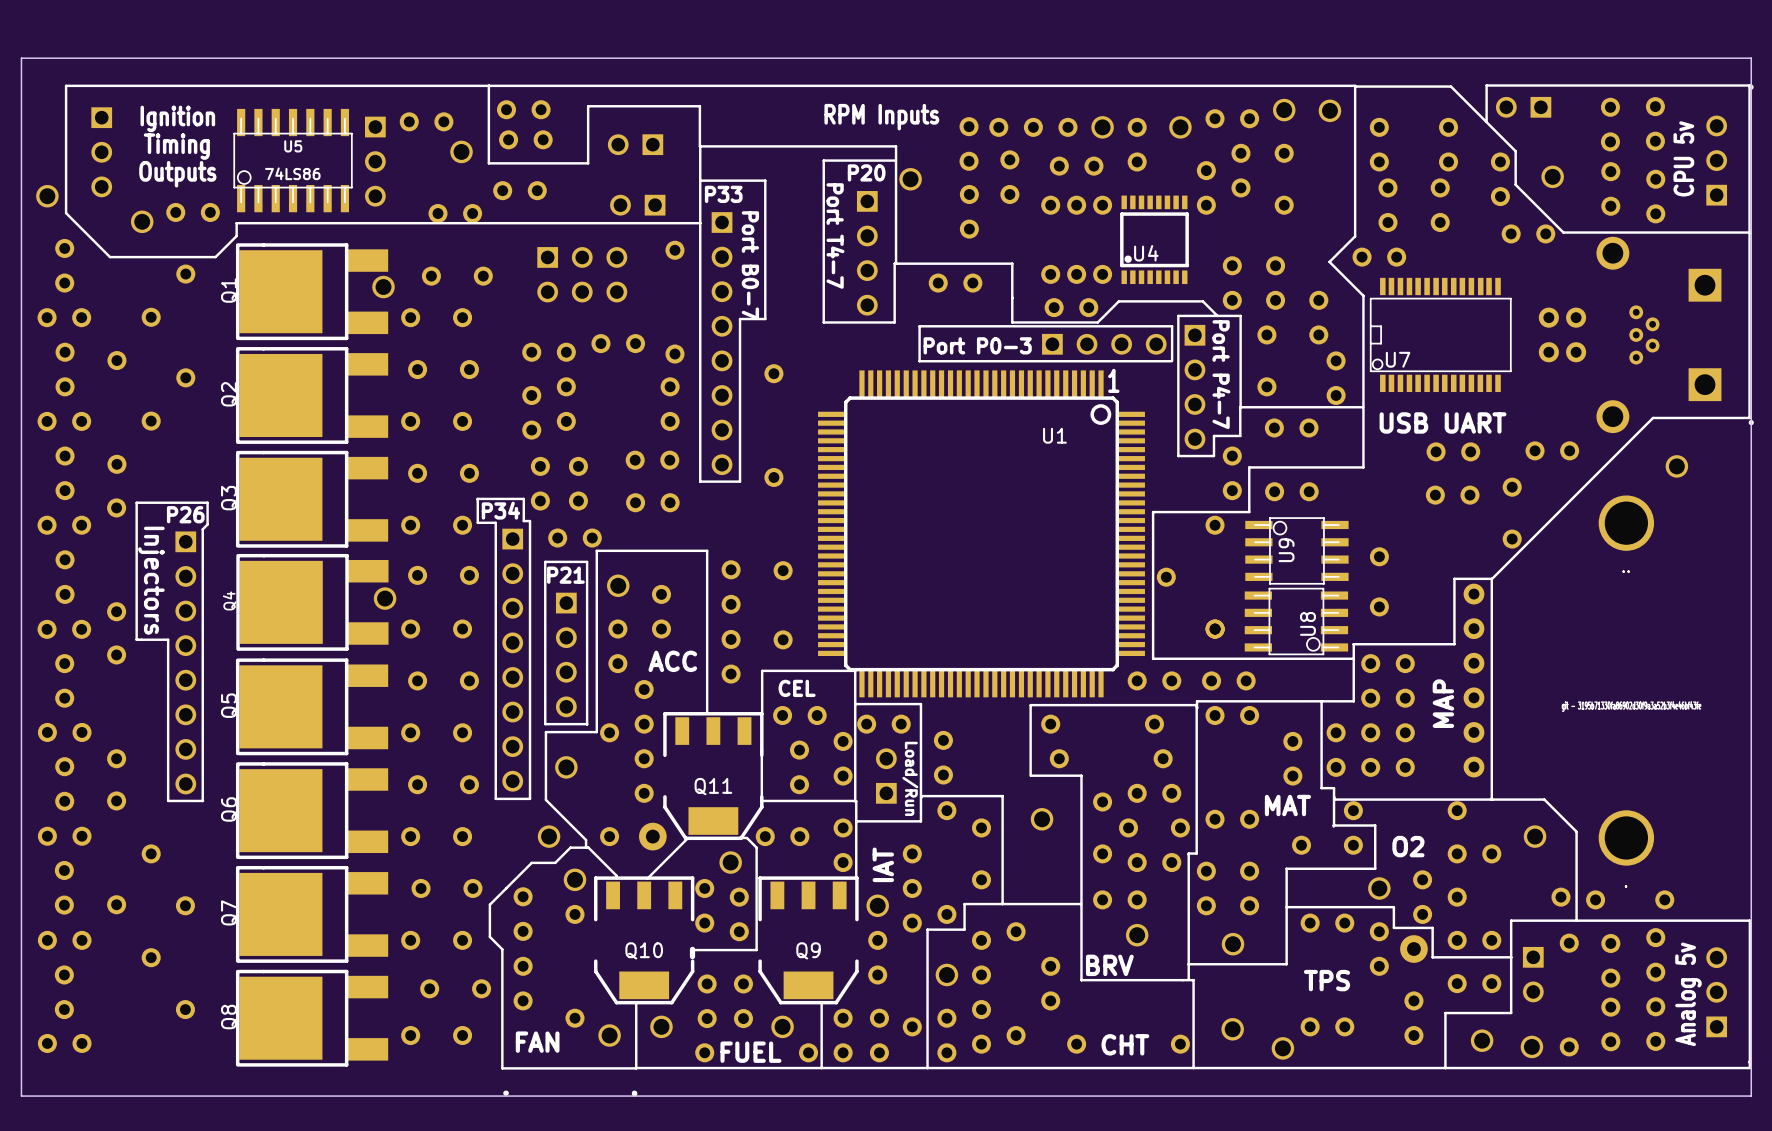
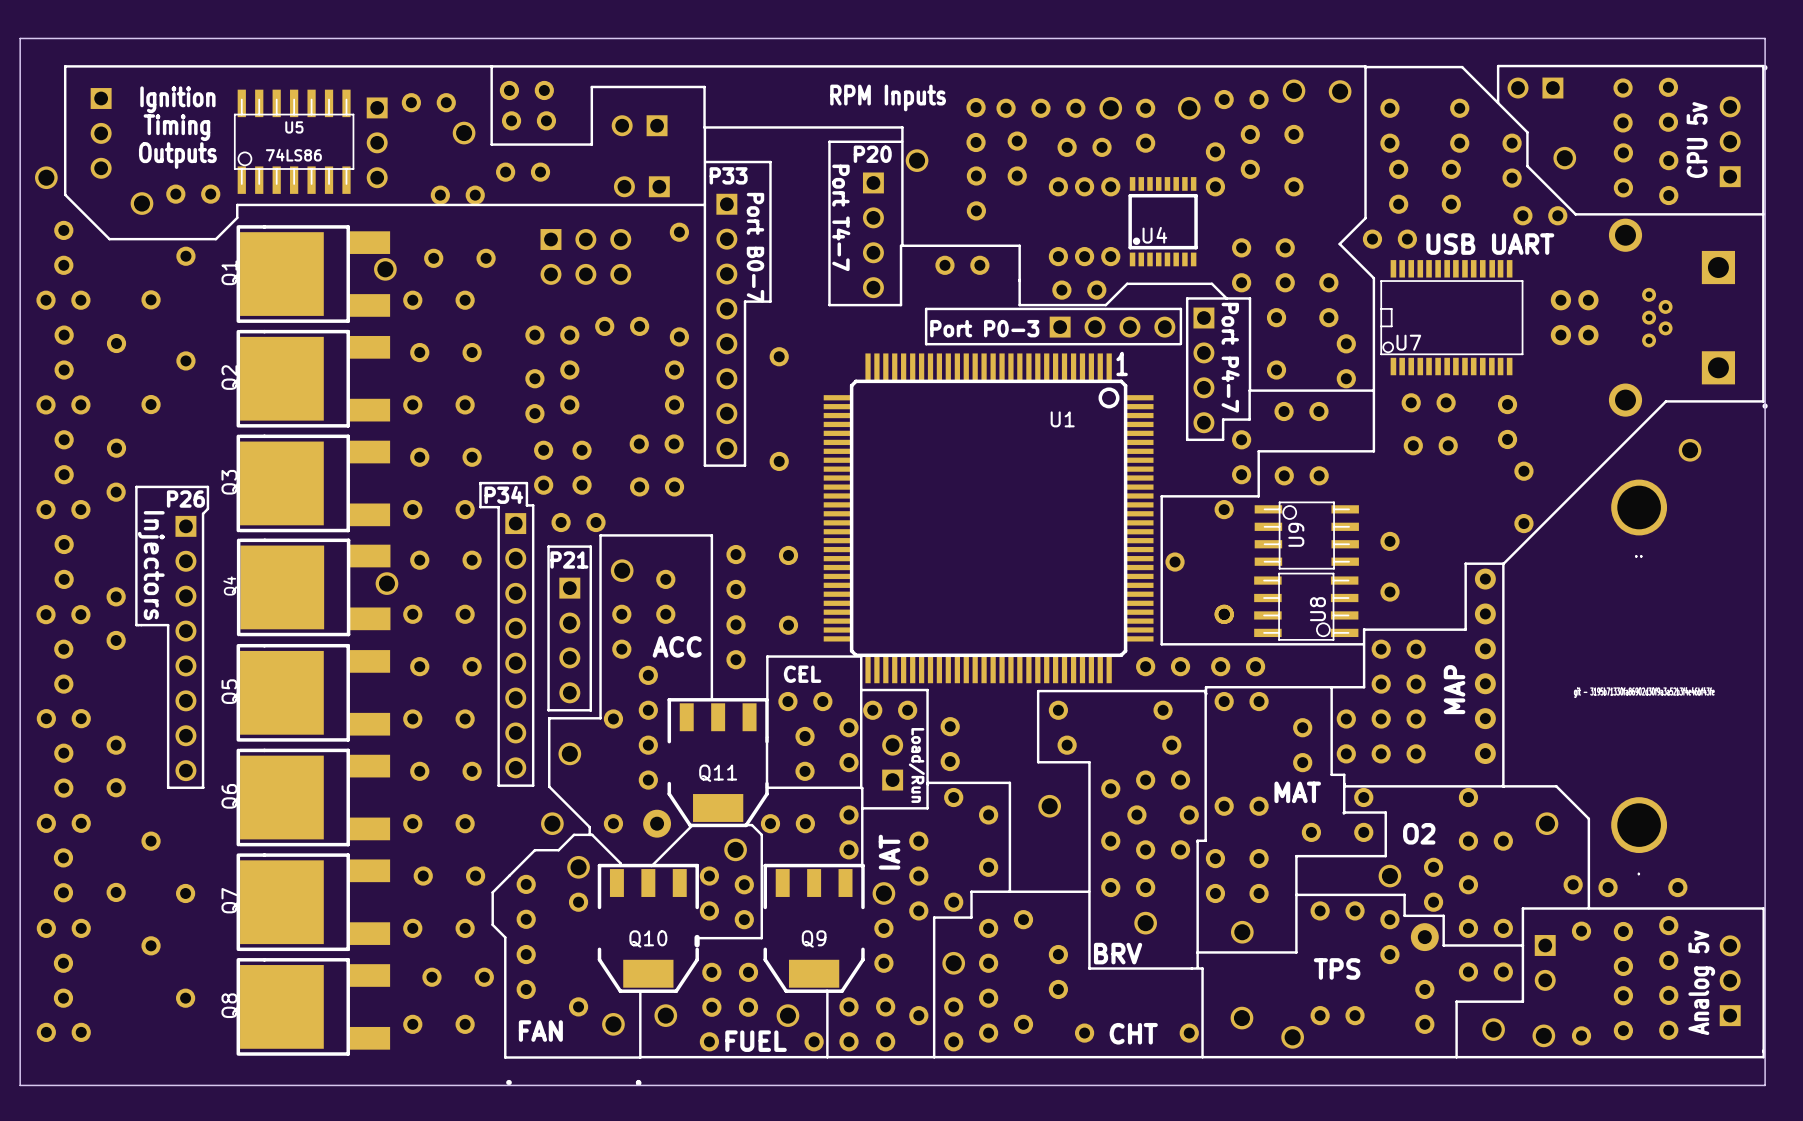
part: none -> (1428, 402)
text position: USB UART (1443, 422) -> USB UART (1490, 244)
part: none -> (1507, 422)
part: (1552, 450) -> none
part: (1453, 451) -> none
part: none -> (1430, 445)
part: (1452, 495) -> none

